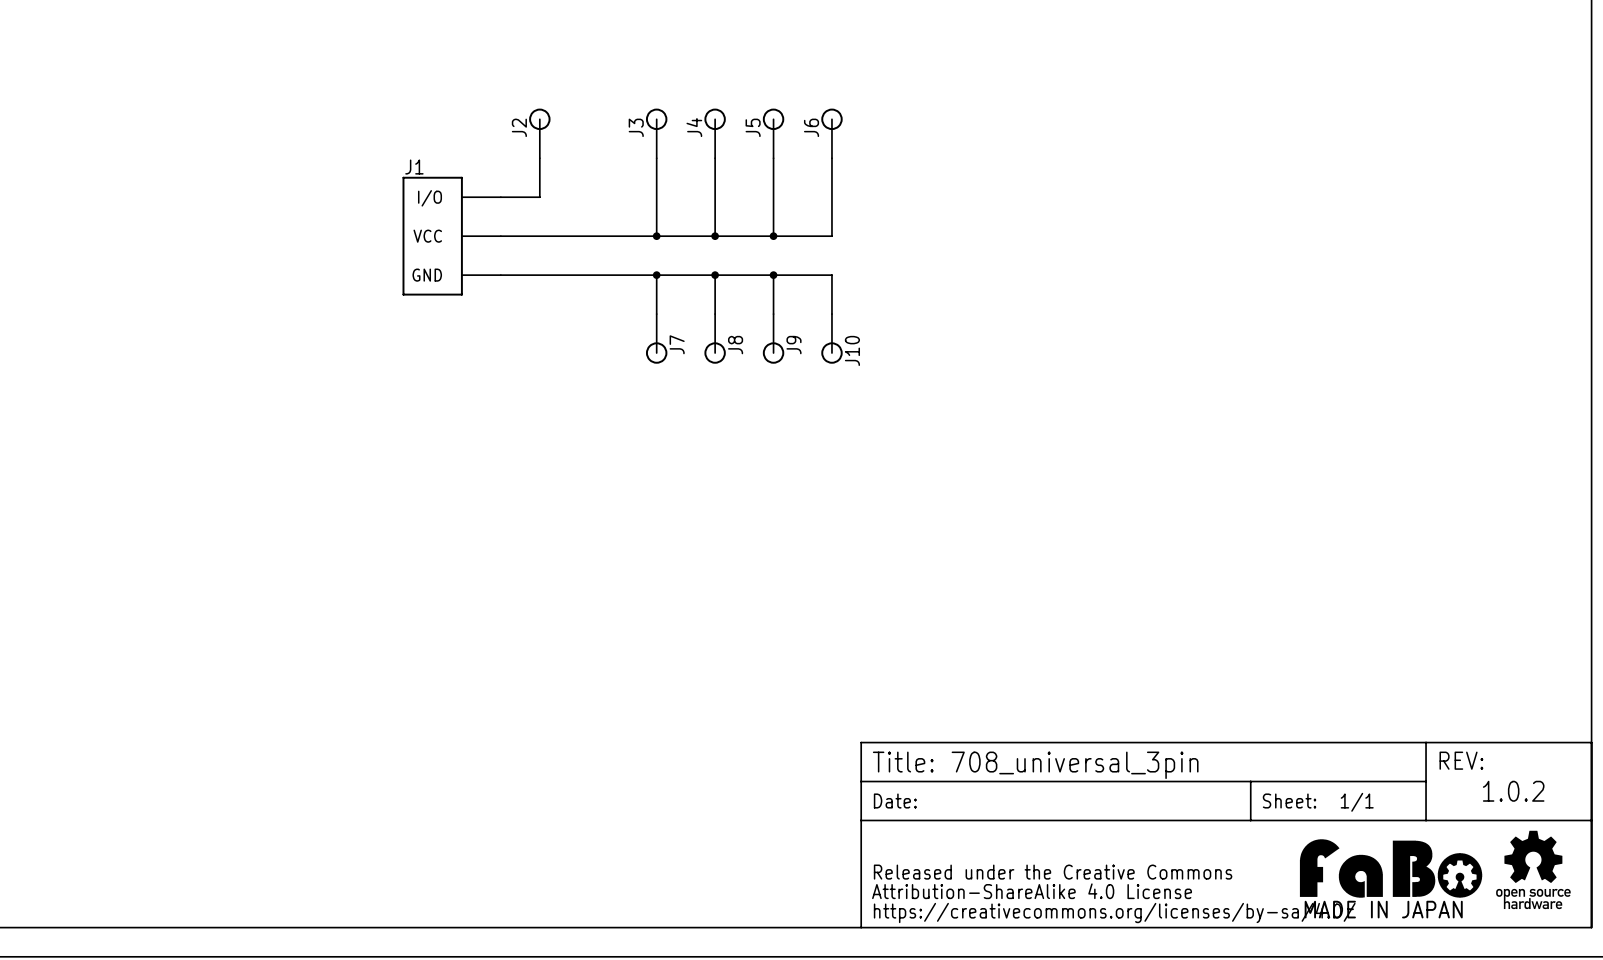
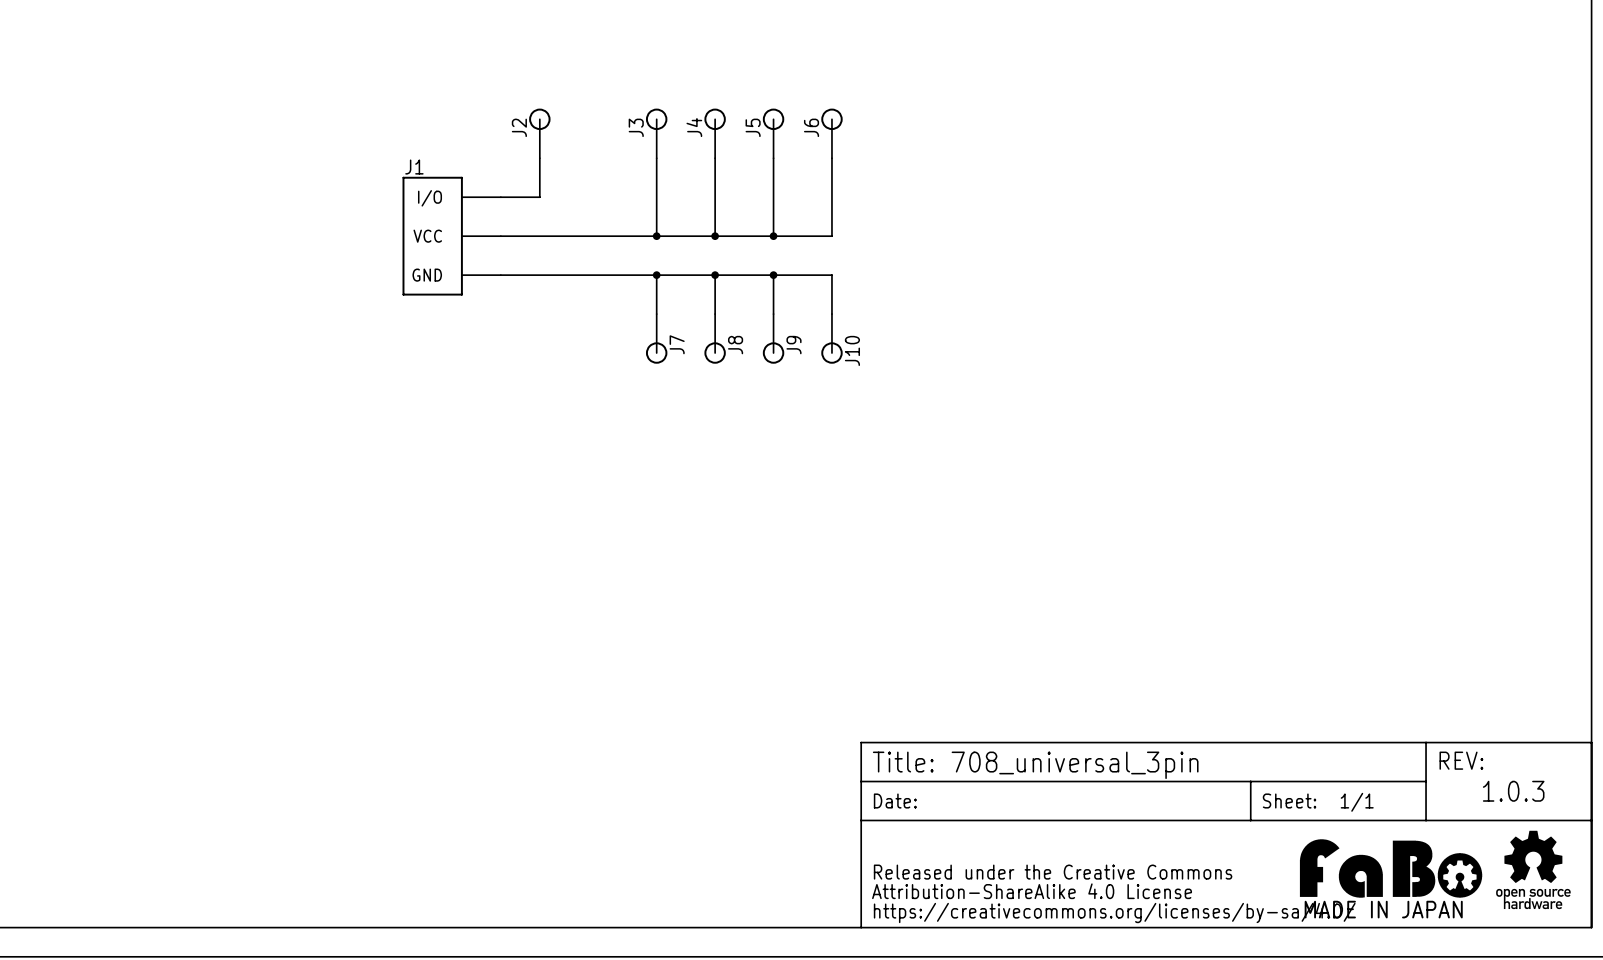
text: 1.0.2 (1513, 791) -> 1.0.3 (1513, 791)

